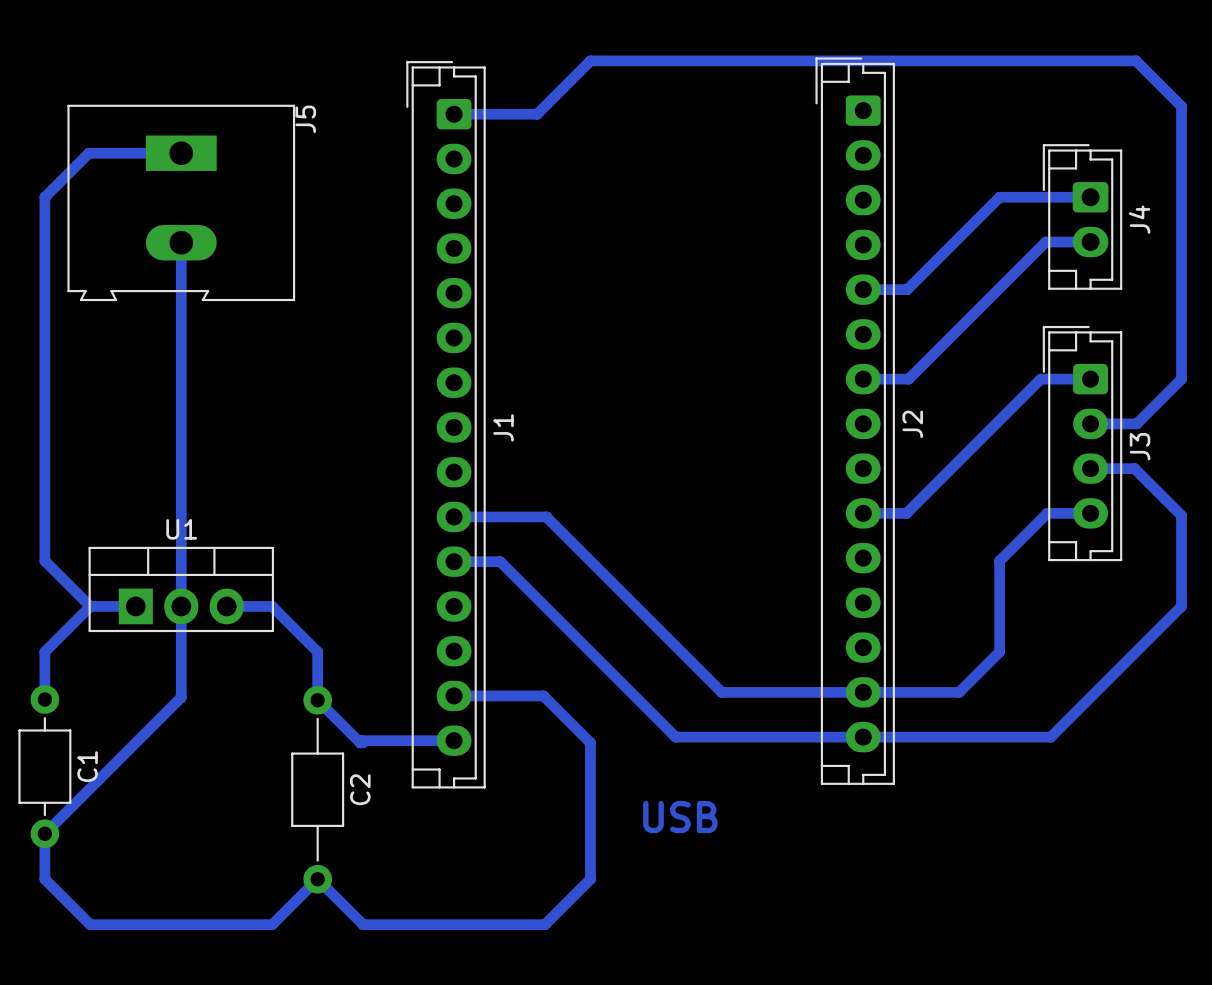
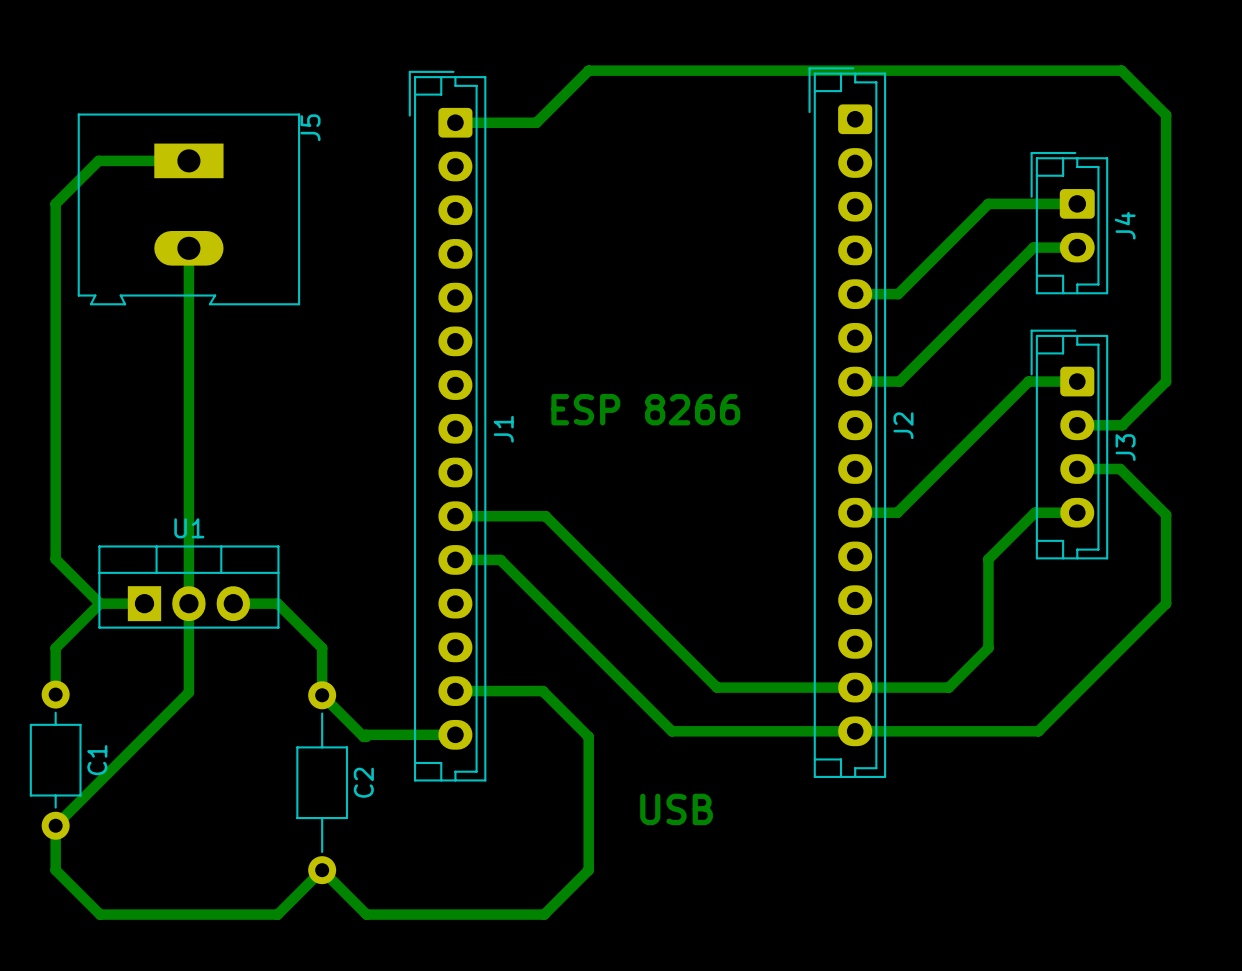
text: none -> ESP 8266 (645, 409)

